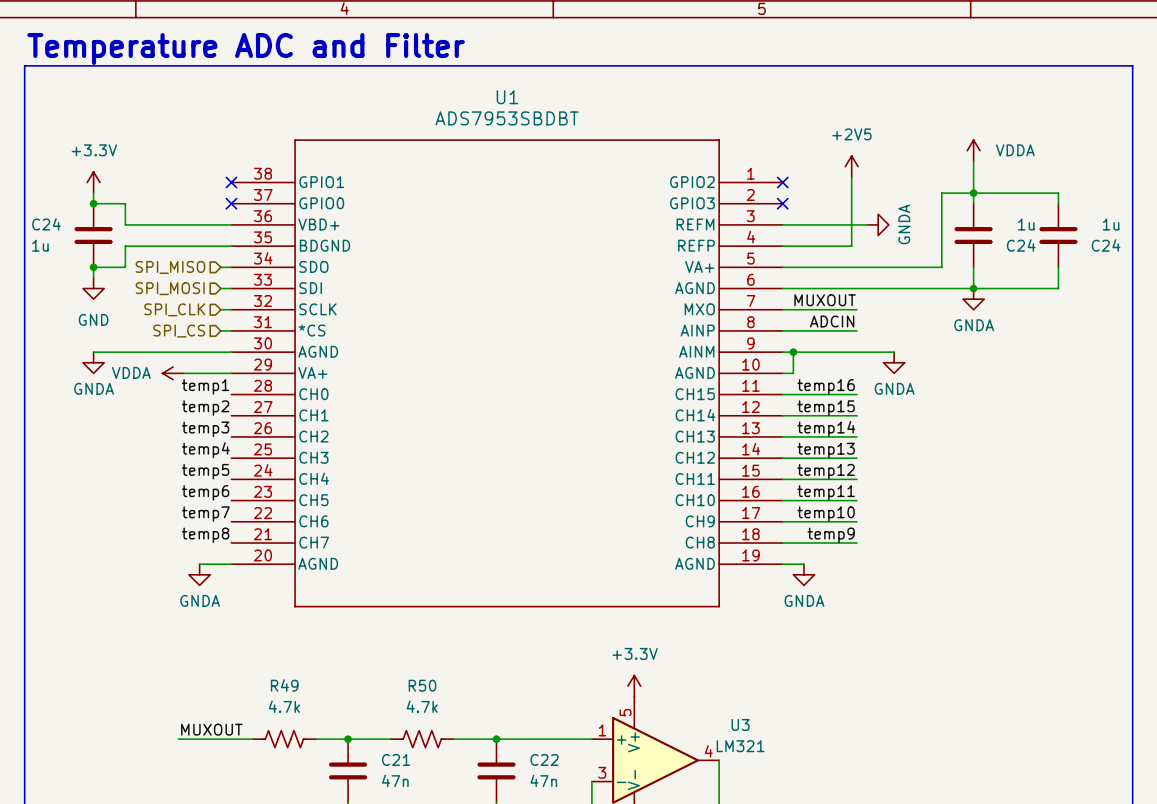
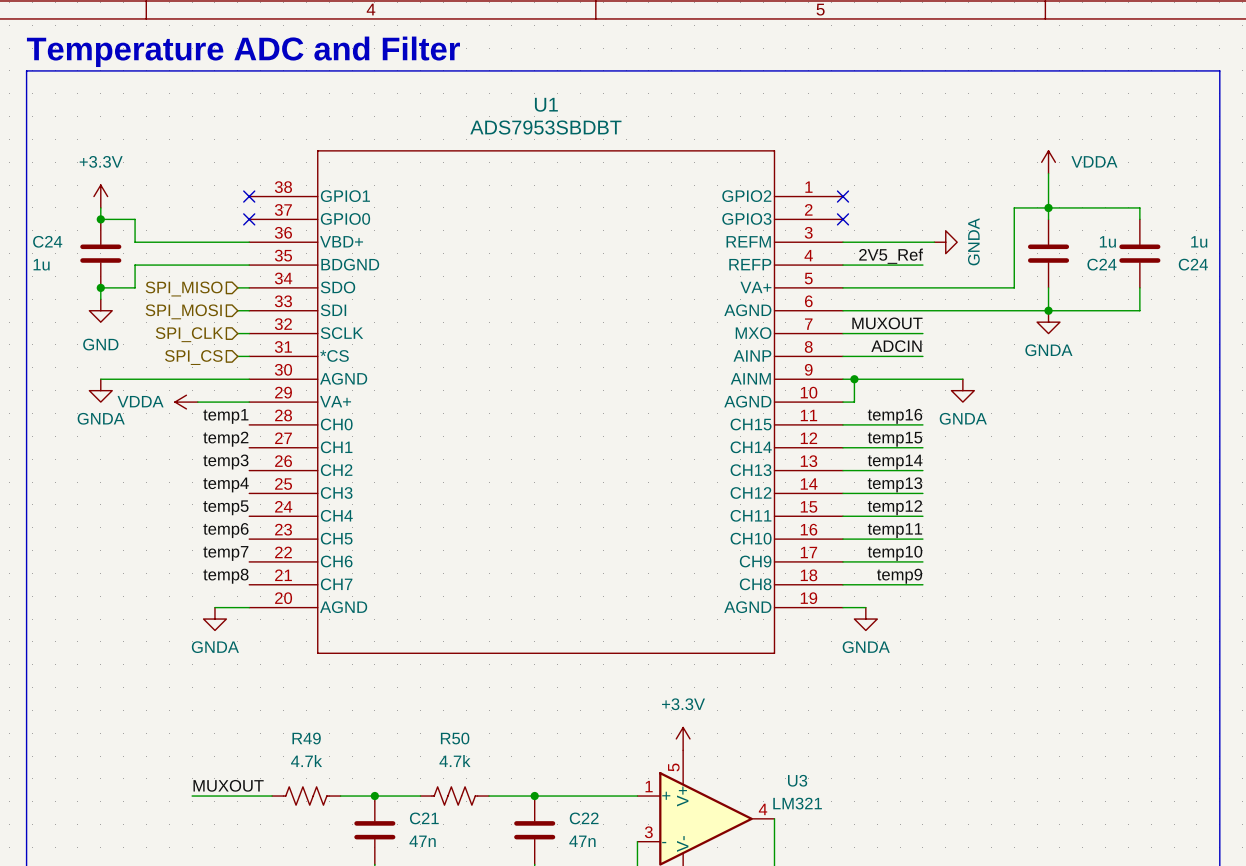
power symbol: +2V5 (851, 166) -> none
wire: (851, 177) (851, 246) -> (922, 265) (917, 265)
label: none -> 2V5_Ref (891, 256)

